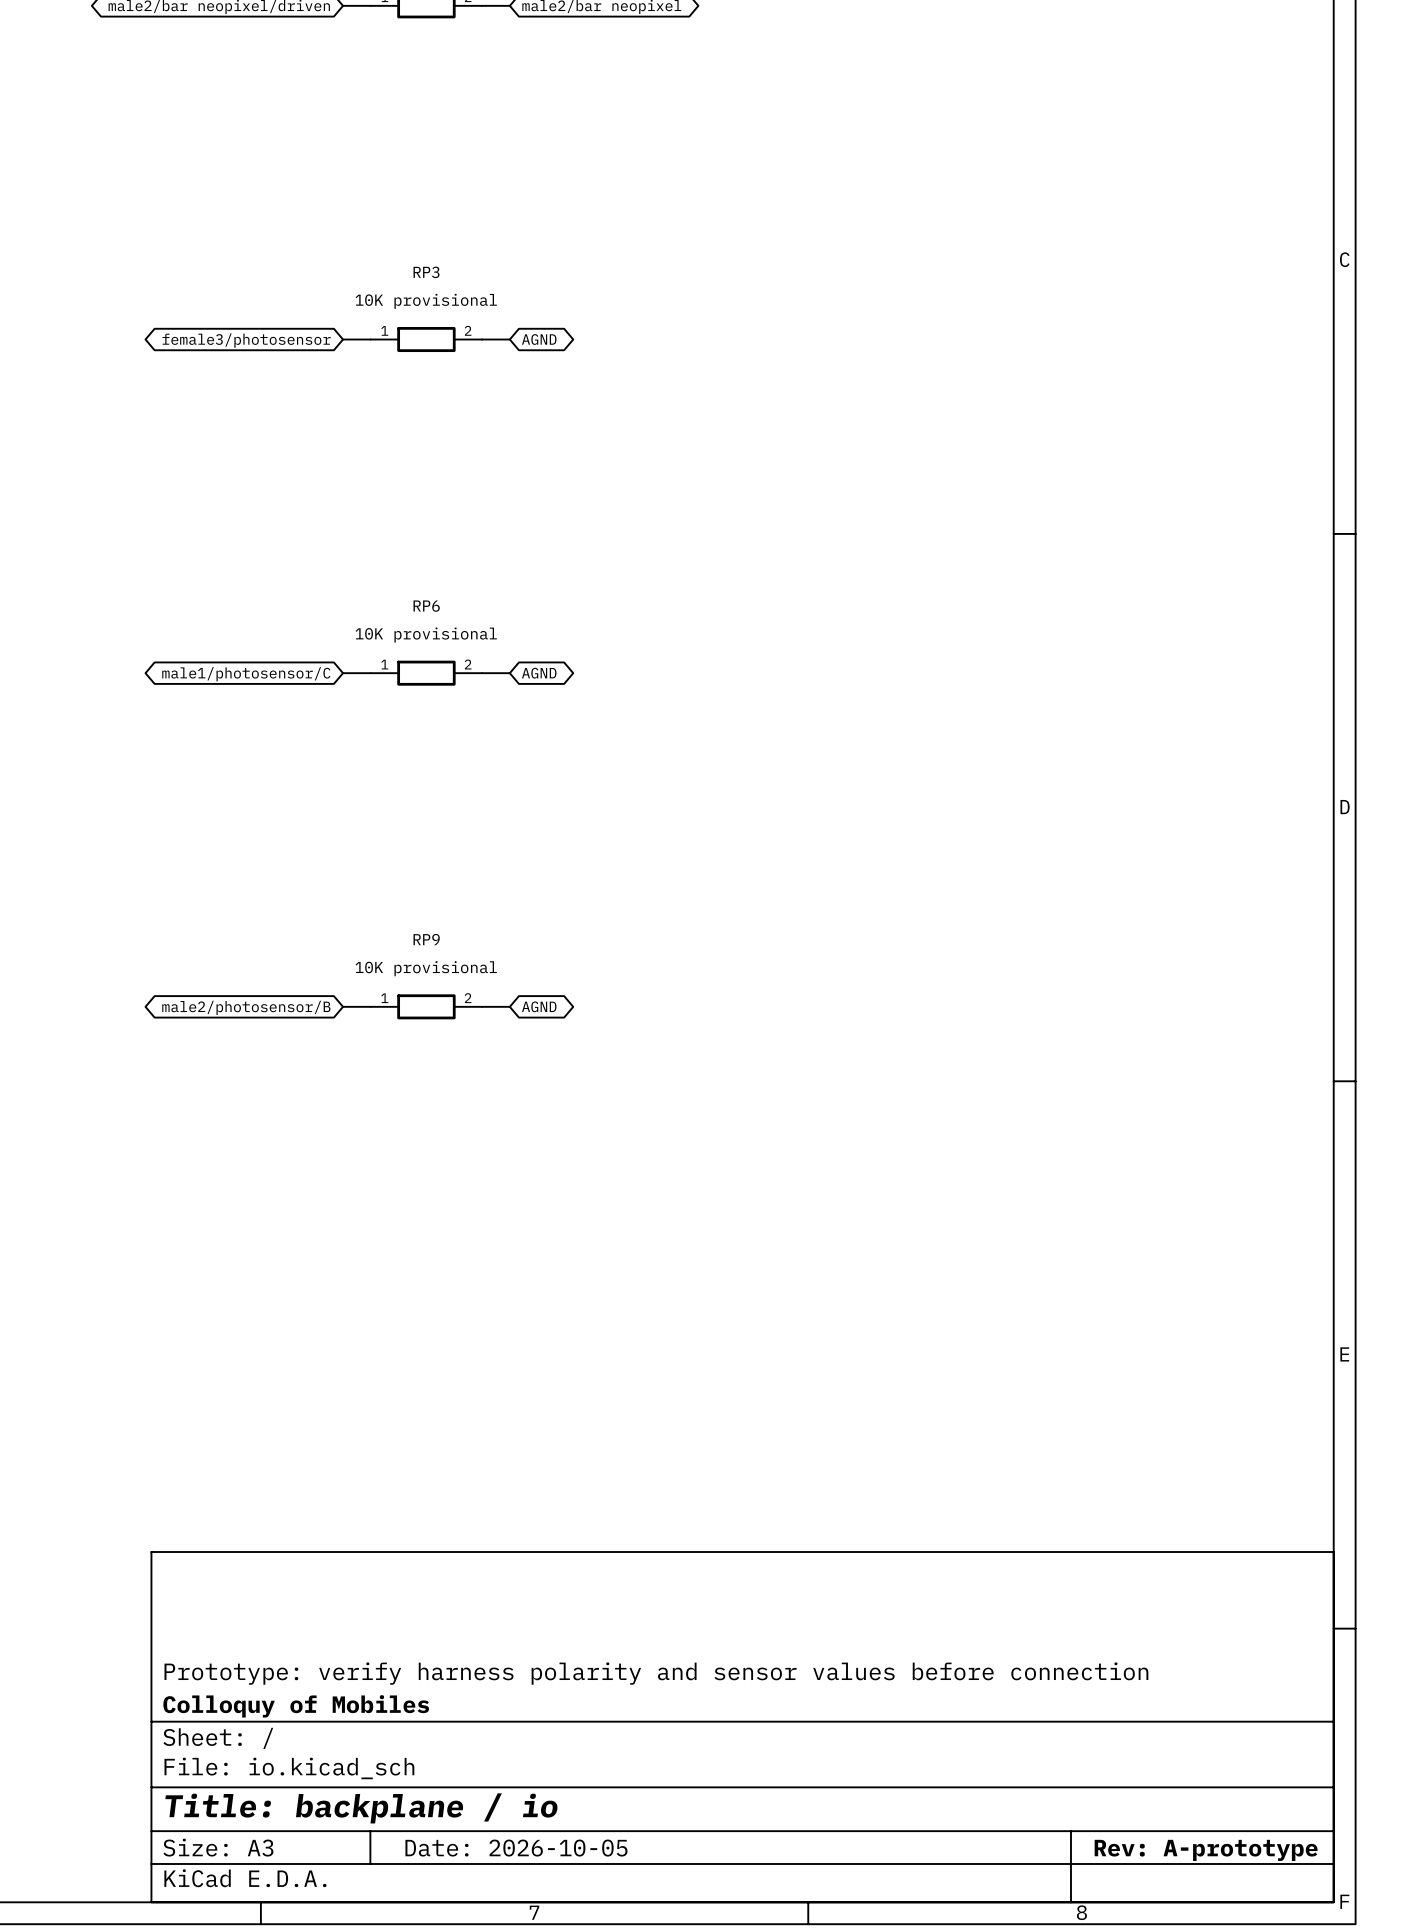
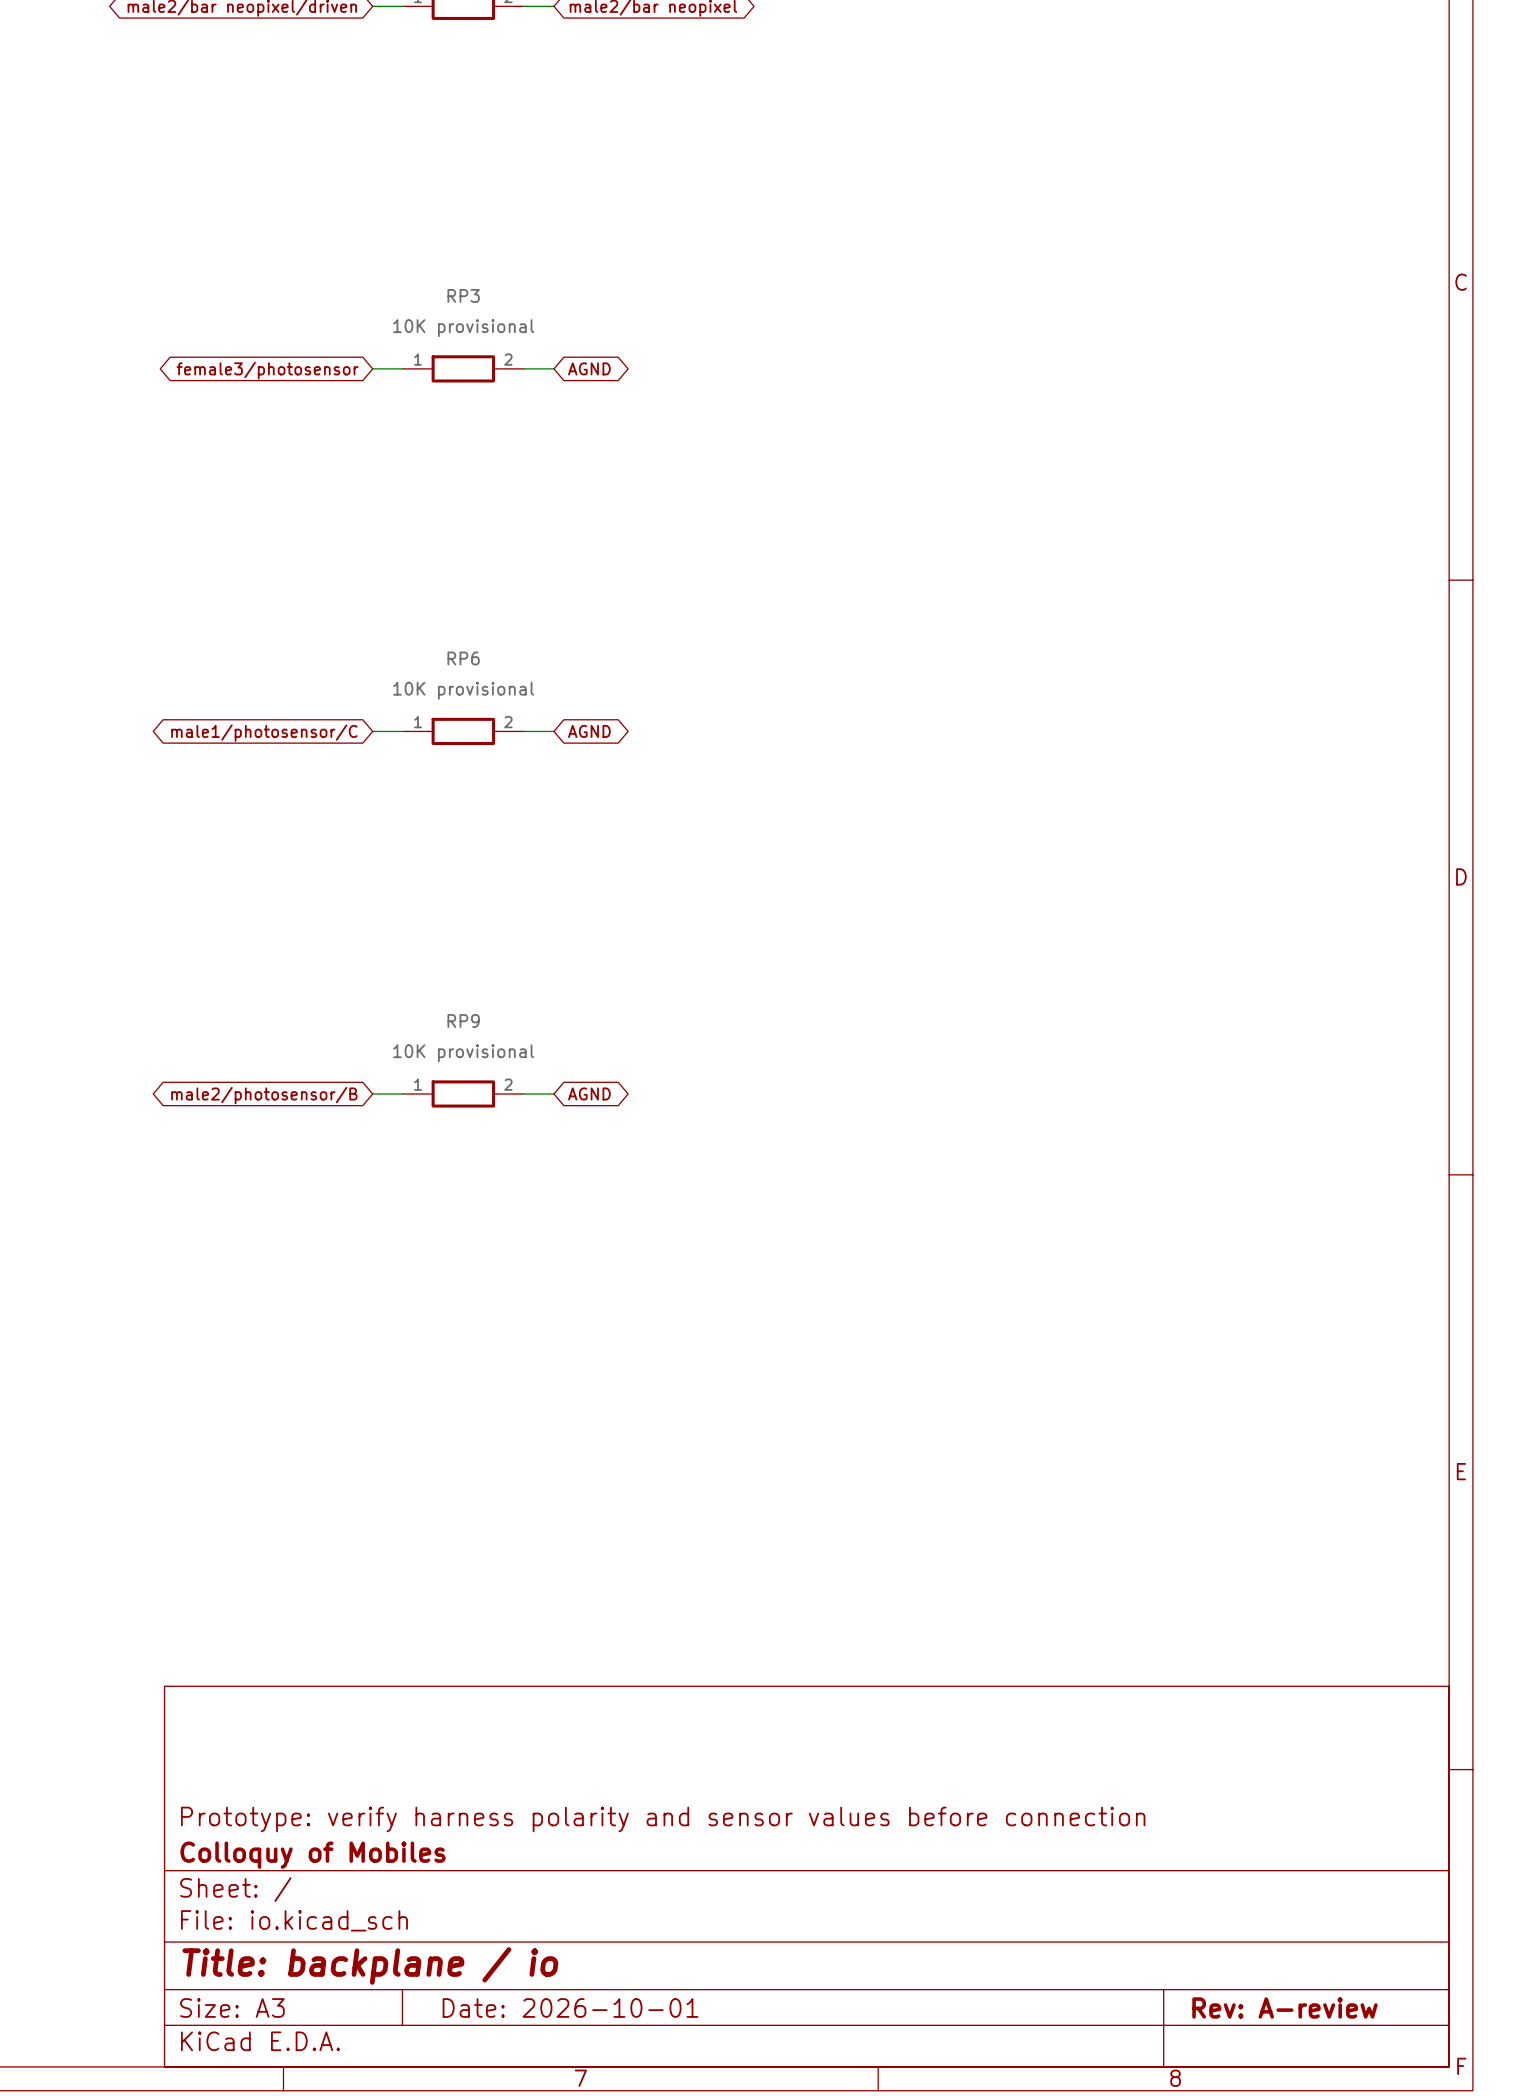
title block: Date: 2026-10-05 (516, 1848) -> Date: 2026-10-01 (570, 2007)
title block: Rev: A-prototype (1206, 1850) -> Rev: A-review (1284, 2007)

